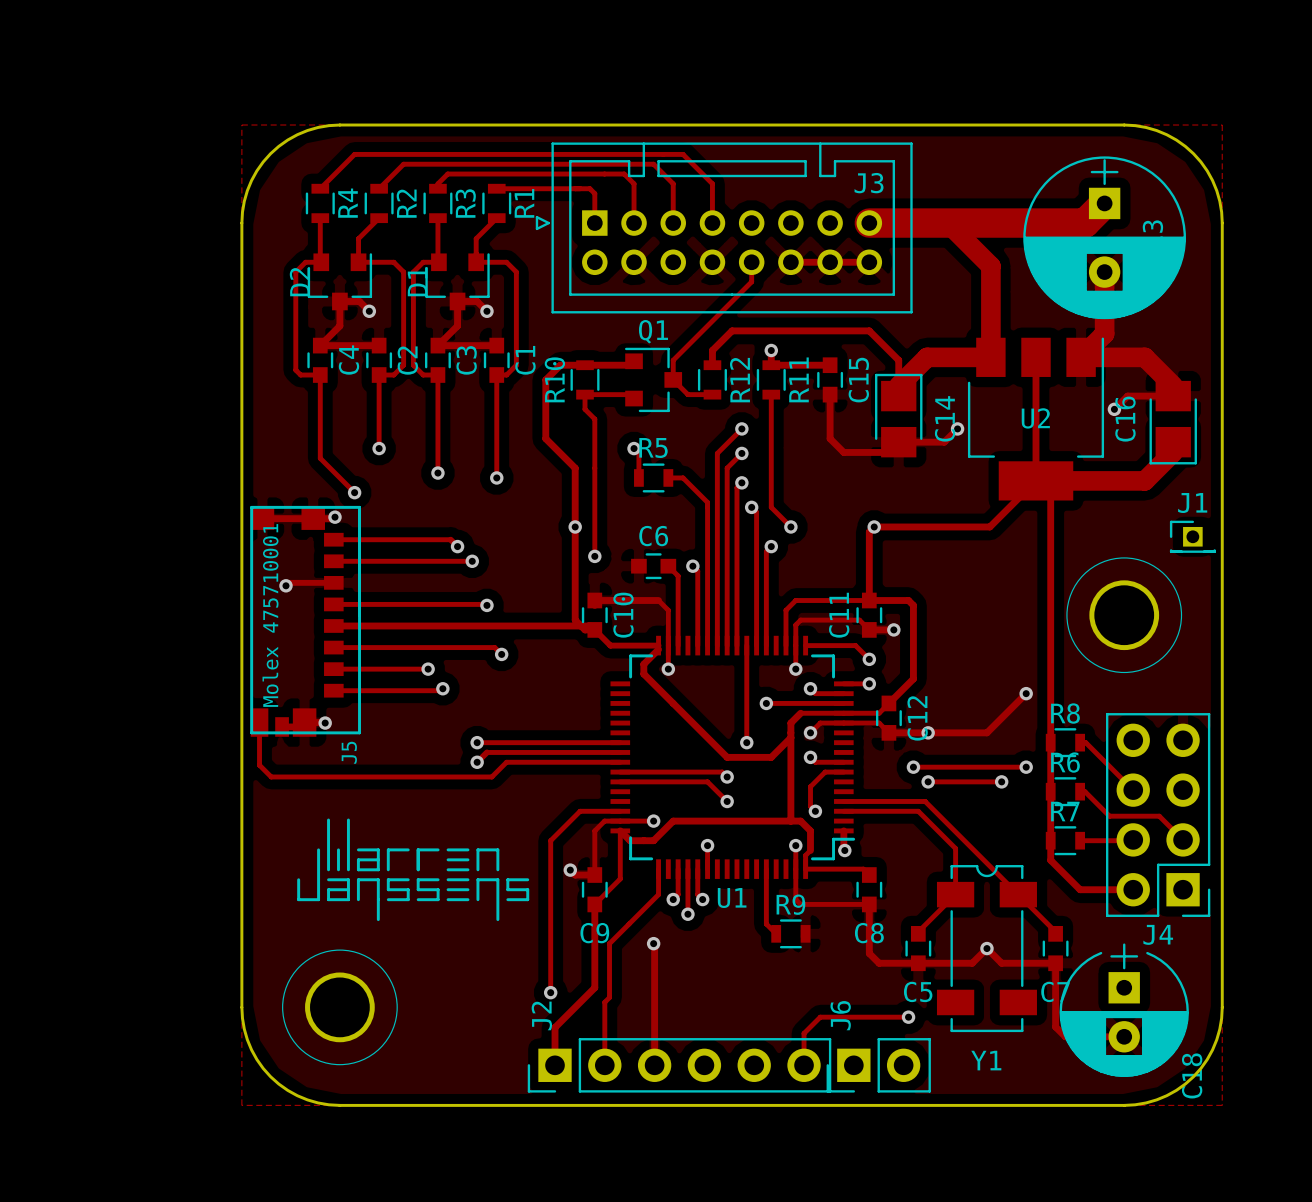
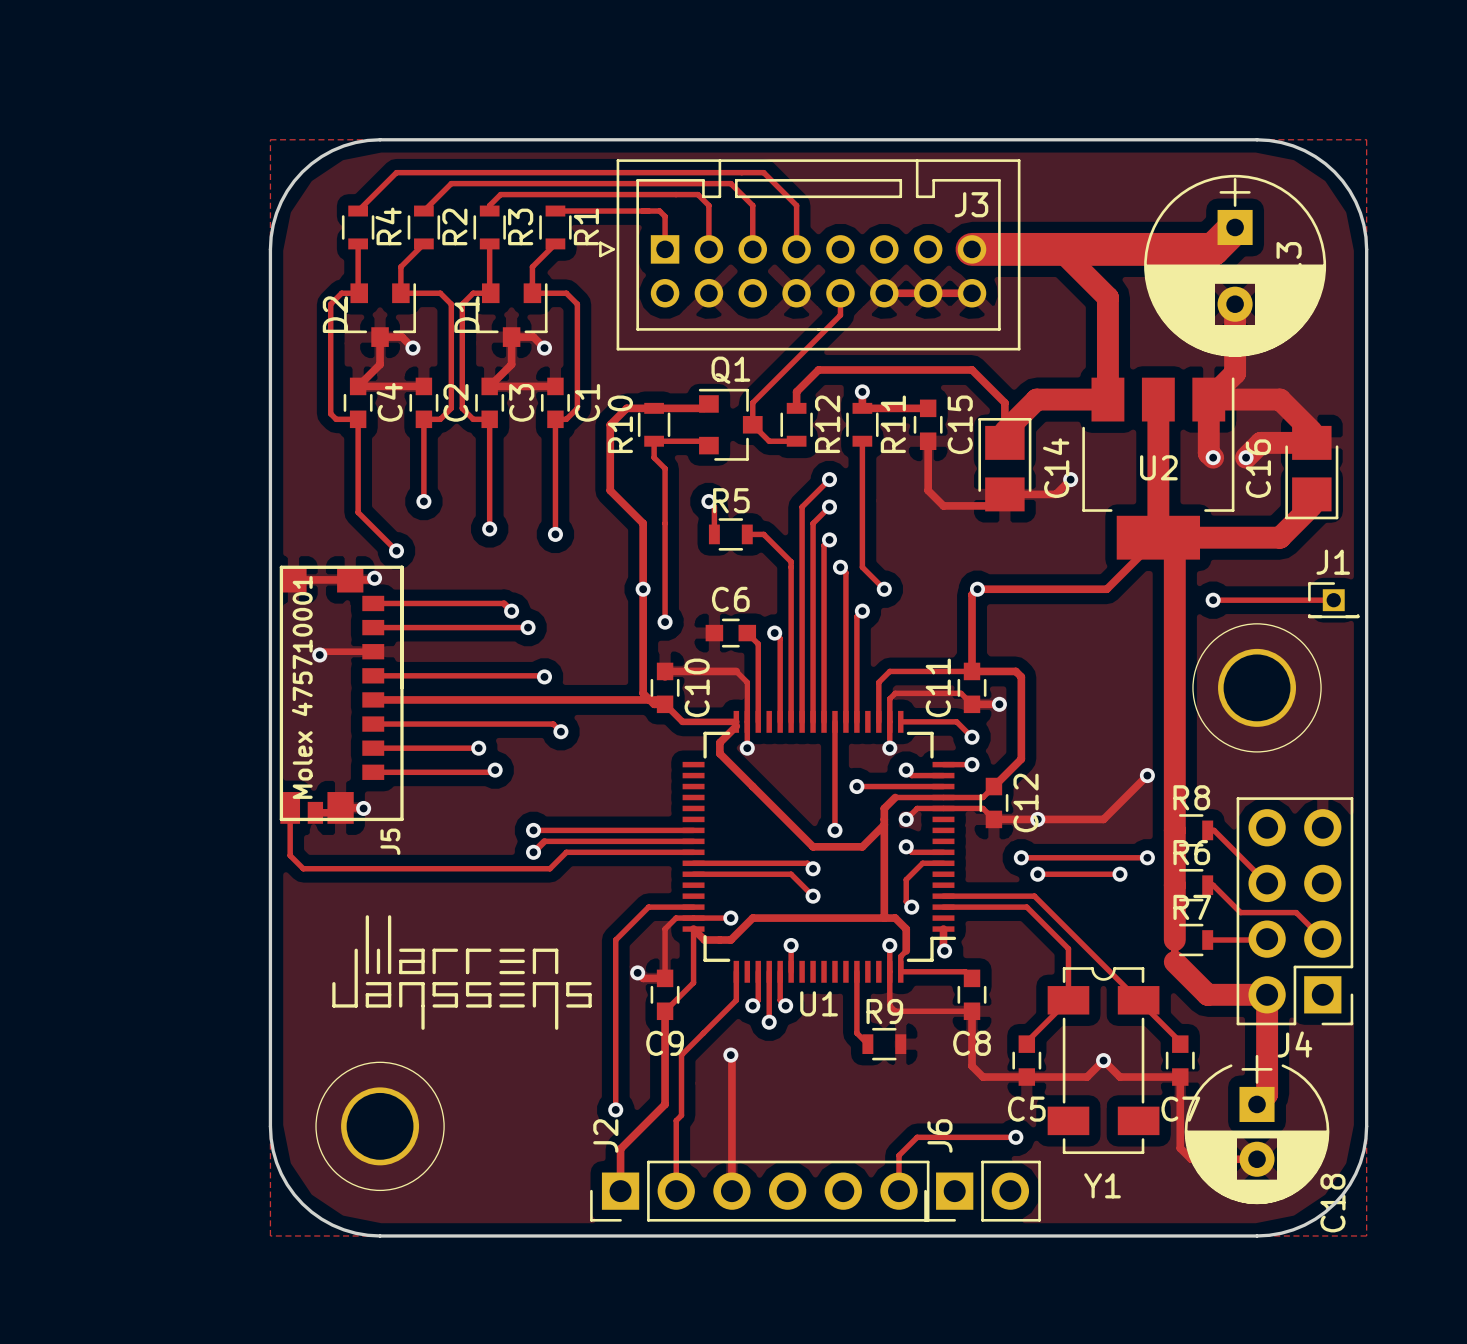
track width: thin (1035, 357) (1035, 480) -> thick (1158, 399) (1158, 537)
track: none -> (1208, 399) (1208, 453) (1213, 457)
track width: thin (1173, 396) (1127, 396) (1114, 409) -> thick (1311, 442) (1260, 442) (1246, 457)
via: none -> (1213, 457)
track width: thin (1050, 495) (1050, 840) -> thick (1174, 554) (1174, 940)
track: none -> (1213, 600) (1333, 600)
via: none -> (1213, 600)
track width: thin (1050, 860) (1080, 889) (1133, 889) -> thick (1174, 961) (1207, 994) (1267, 994)
track: none -> (1267, 994) (1267, 1094) (1257, 1104)

